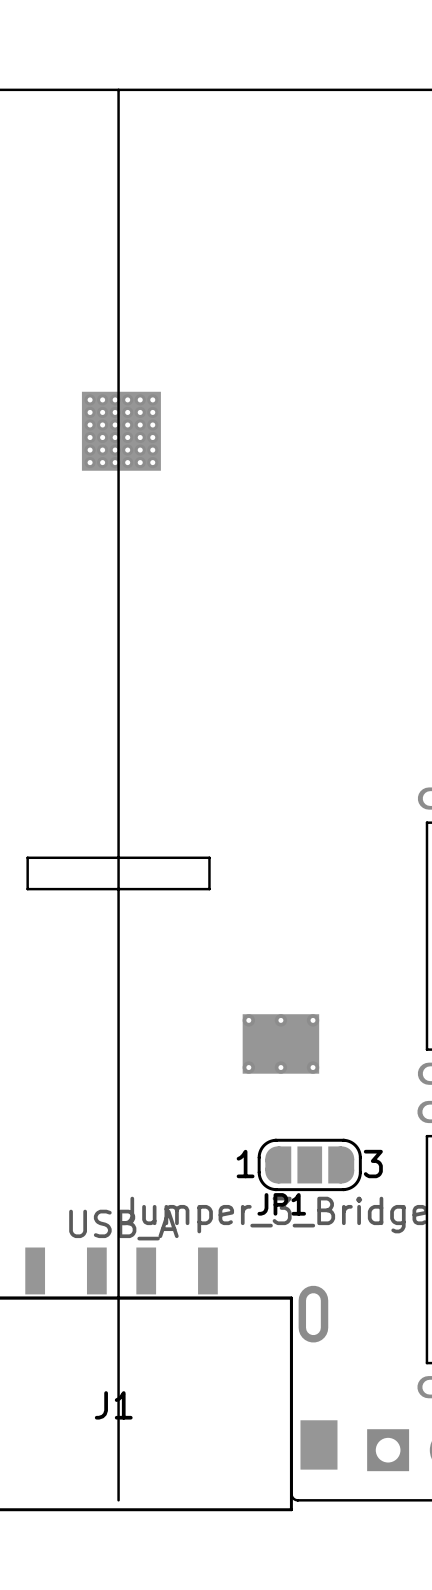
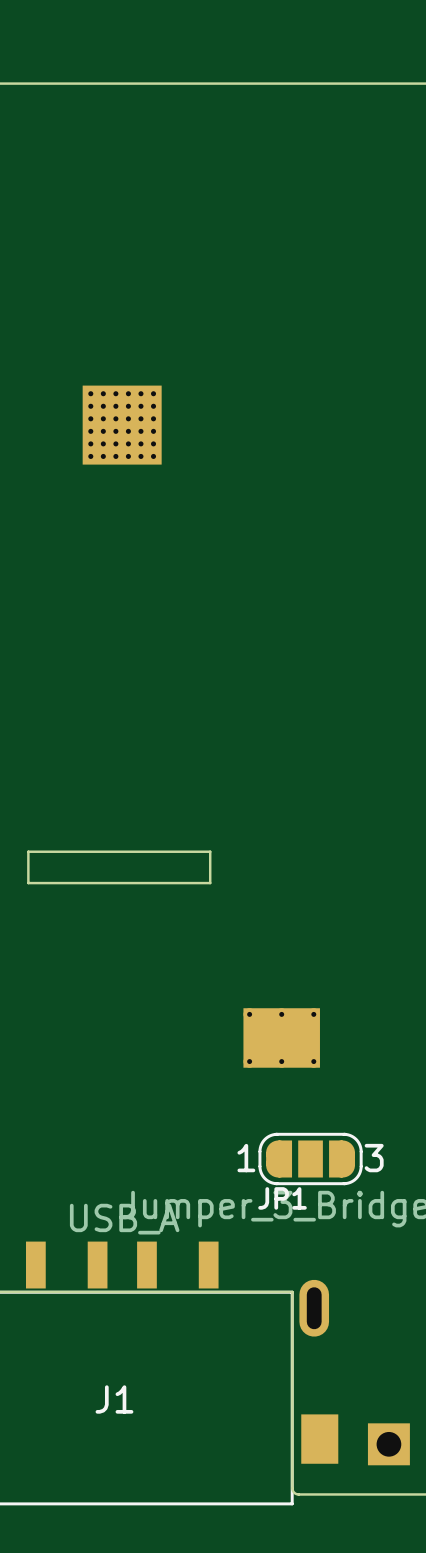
board edge: (118, 89) (118, 1500) -> none

